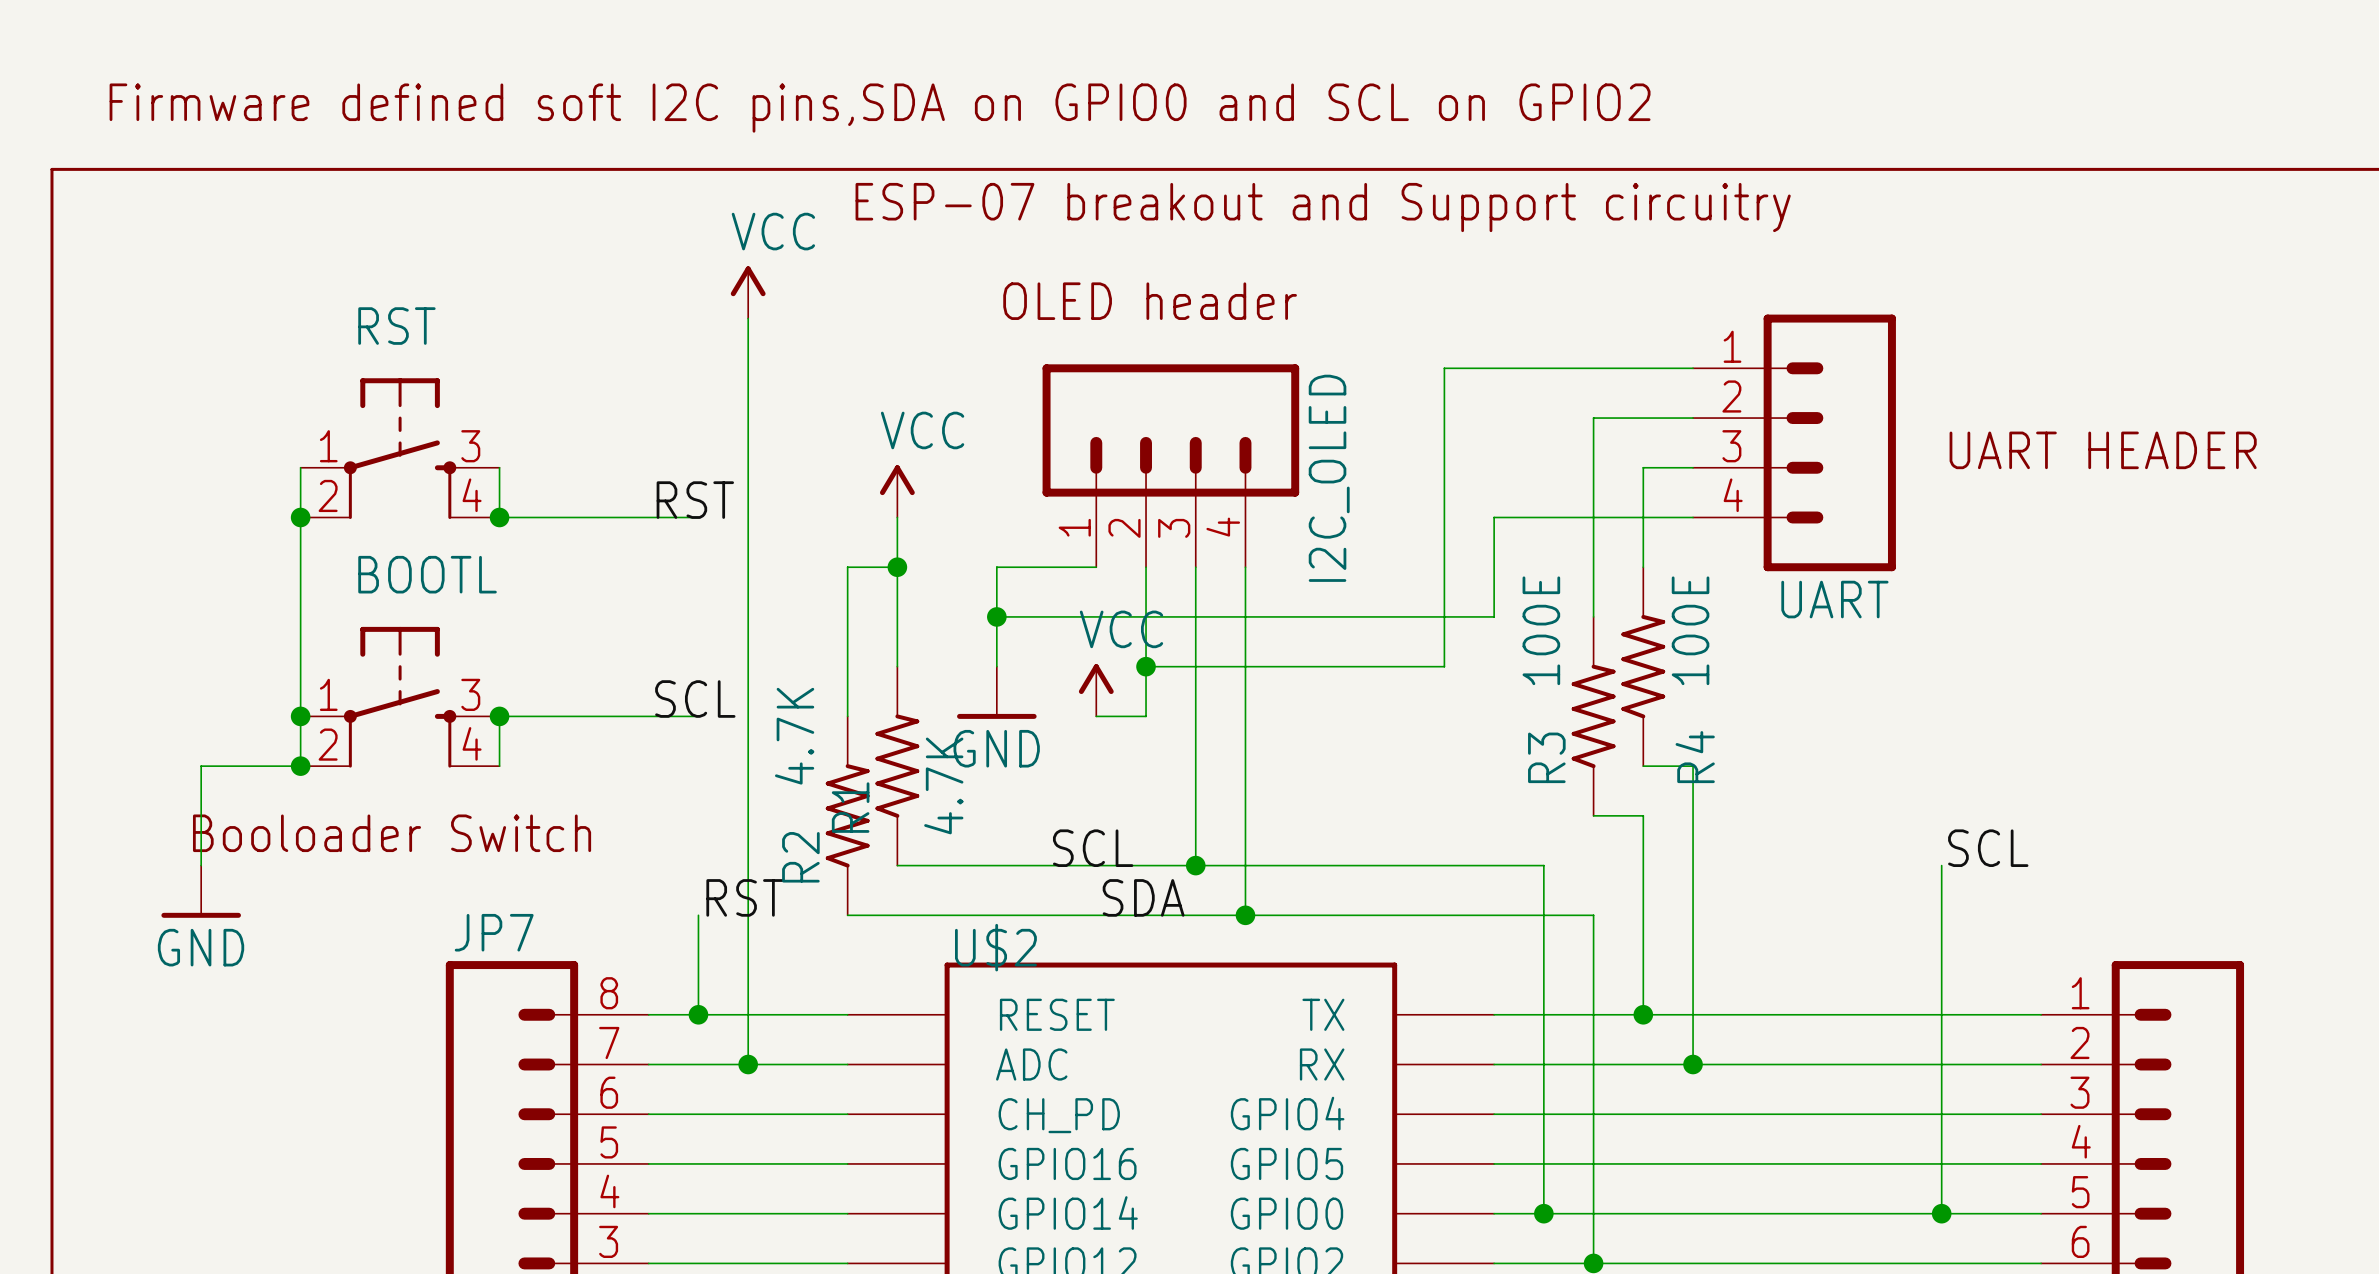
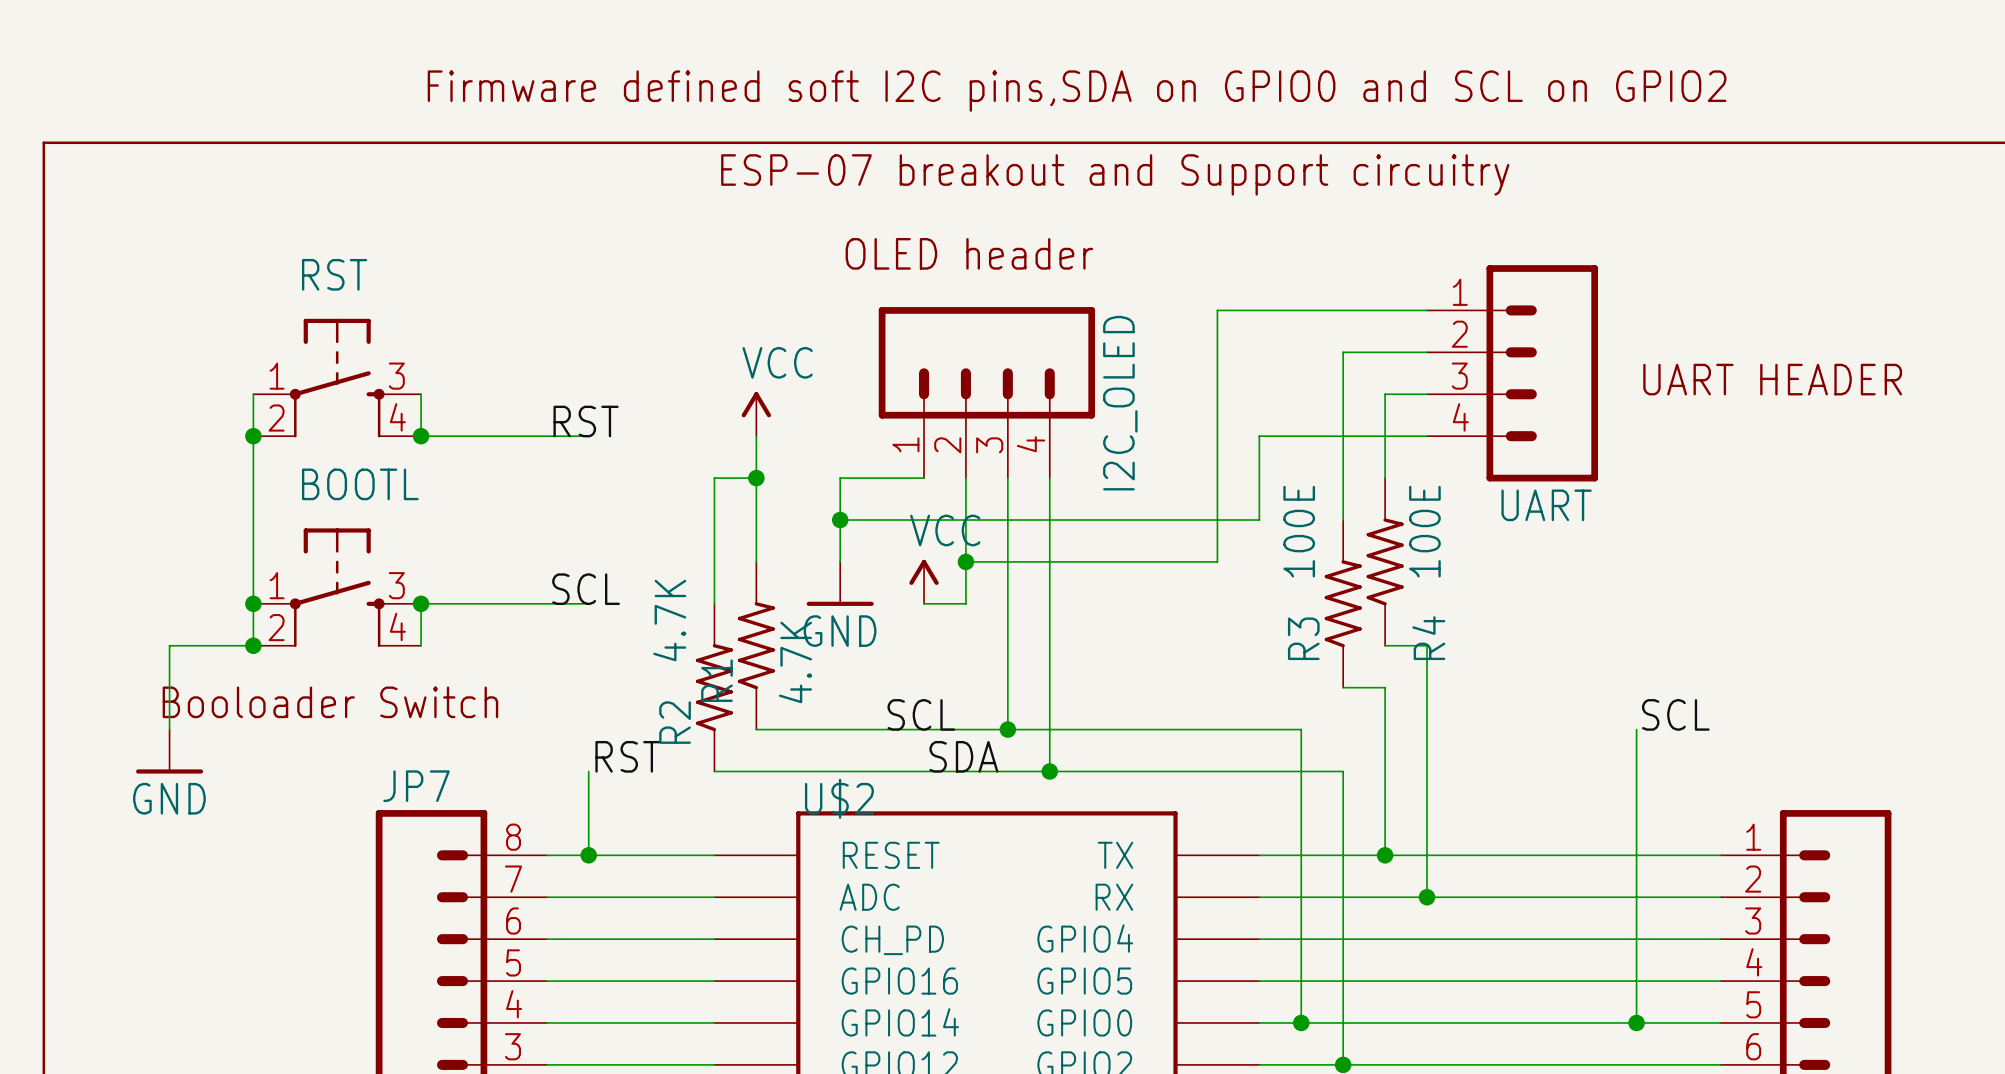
text position: Firmware defined soft I2C pins,SDA on GPIO0 and SCL on GPIO2 (880, 108) -> Firmware defined soft I2C pins,SDA on GPIO0 and SCL on GPIO2 (1077, 91)
power symbol: VCC (748, 292) -> none
wire: (748, 318) (748, 1064) -> none
junction: (748, 1064) -> none

